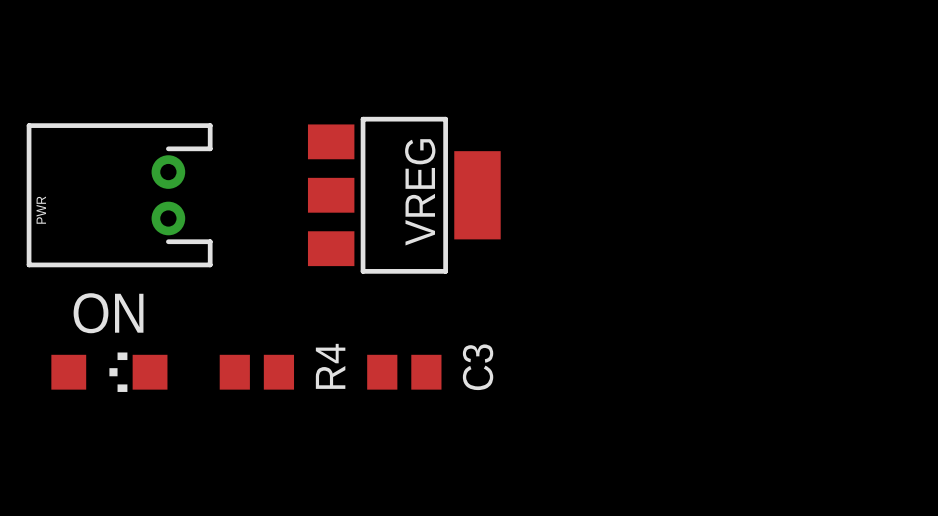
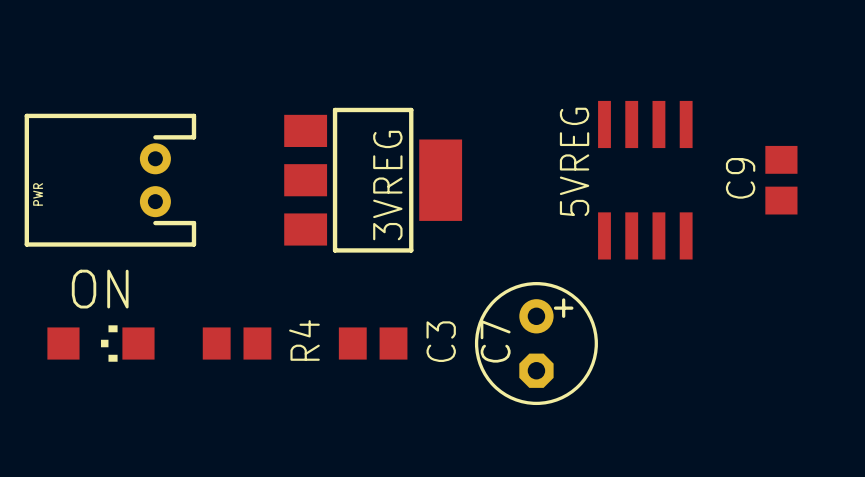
VREG name: VREG (420, 192) -> 3VREG (387, 185)
5VREG: none -> (645, 180)
C9: none -> (781, 180)
C7: none -> (536, 343)

